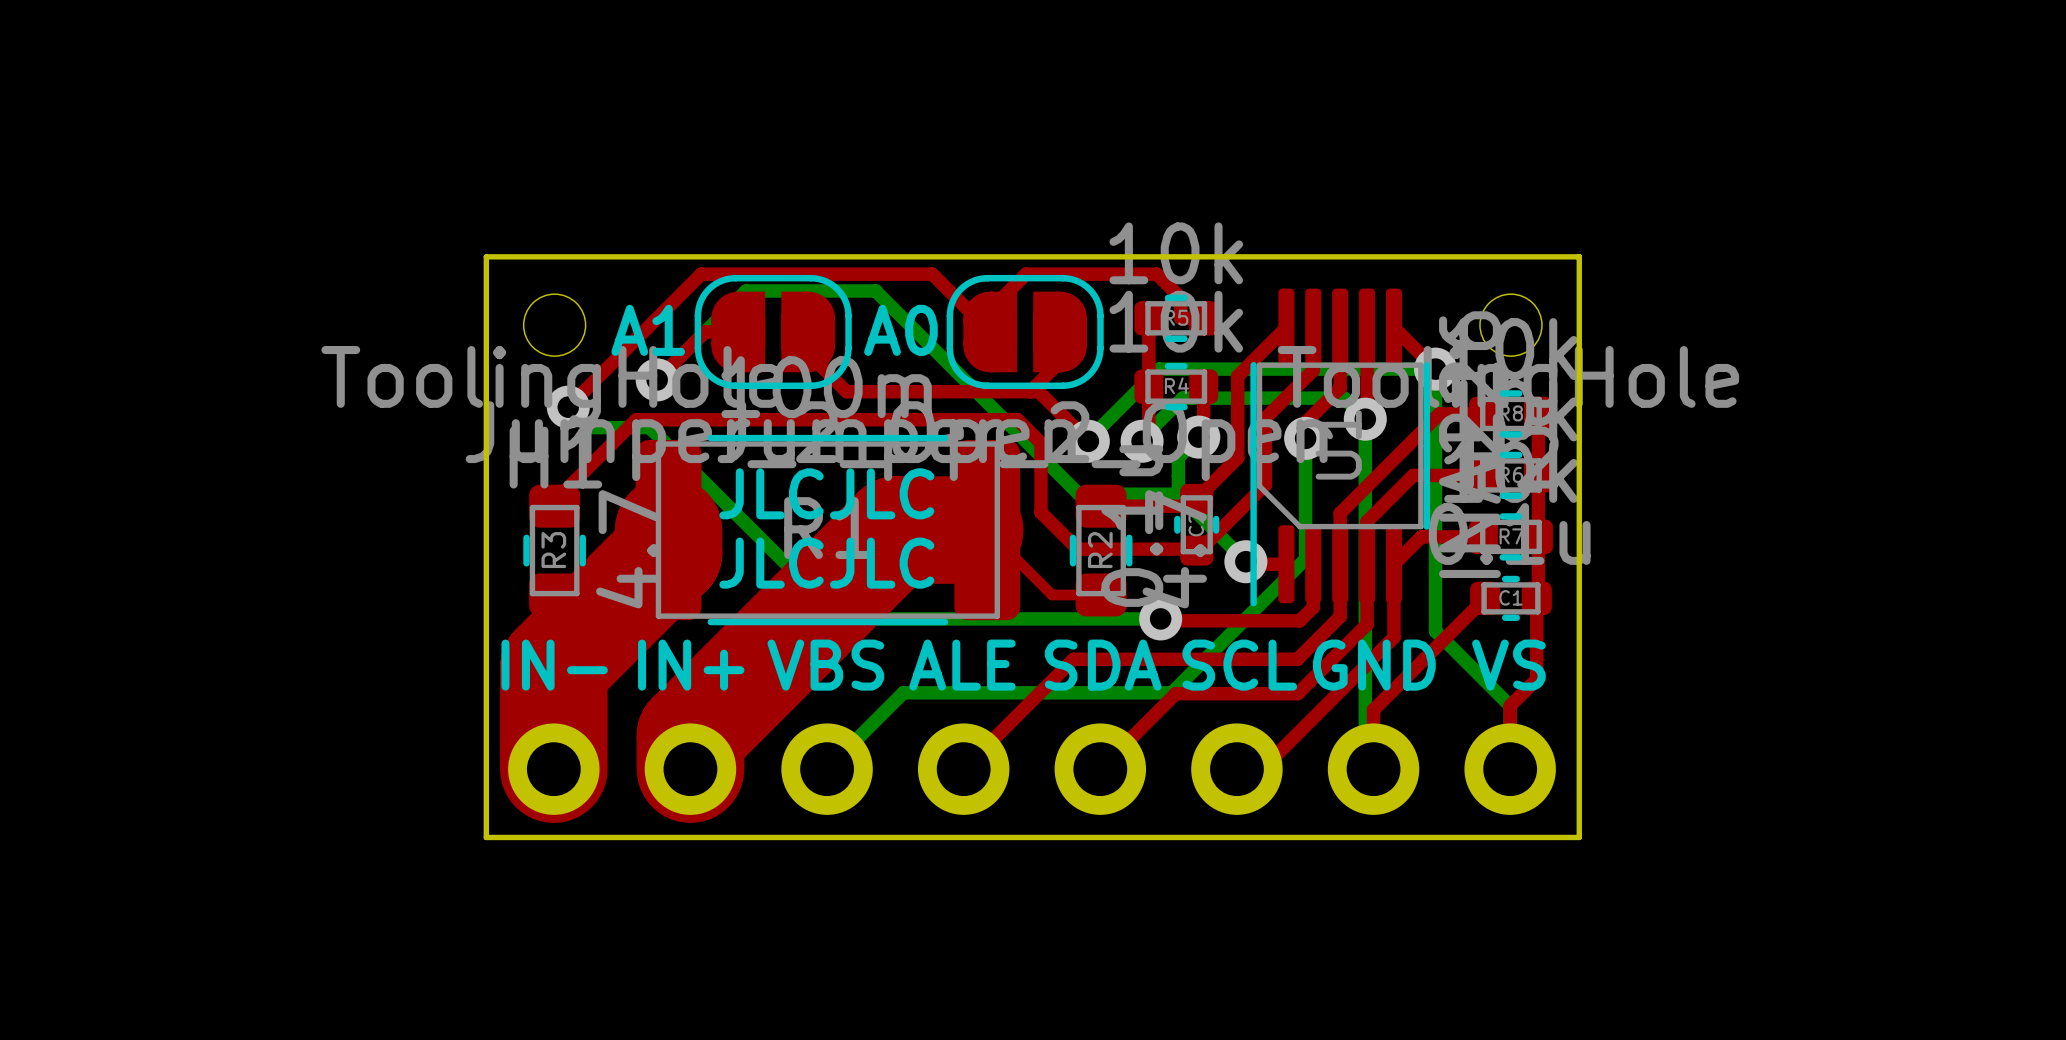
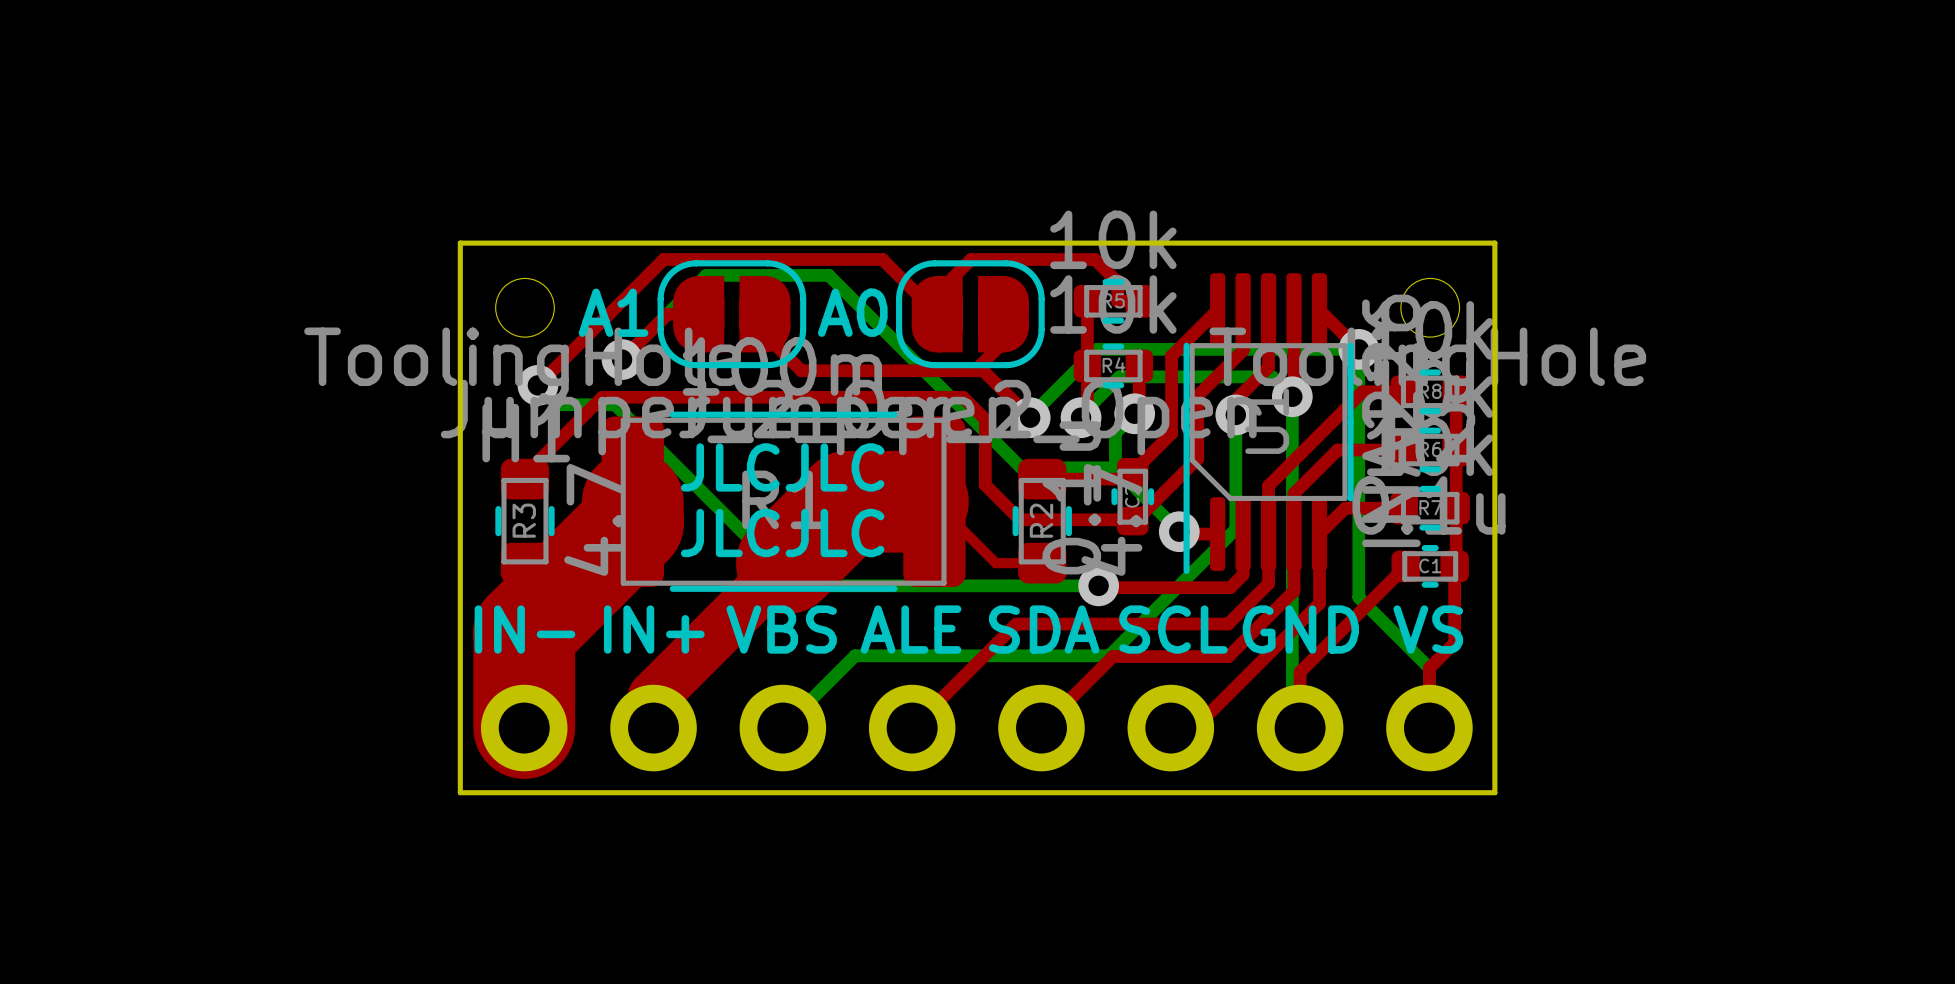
top track width: thick (831, 594) (690, 735) (690, 769) -> thin (786, 563) (653, 696) (653, 728)

